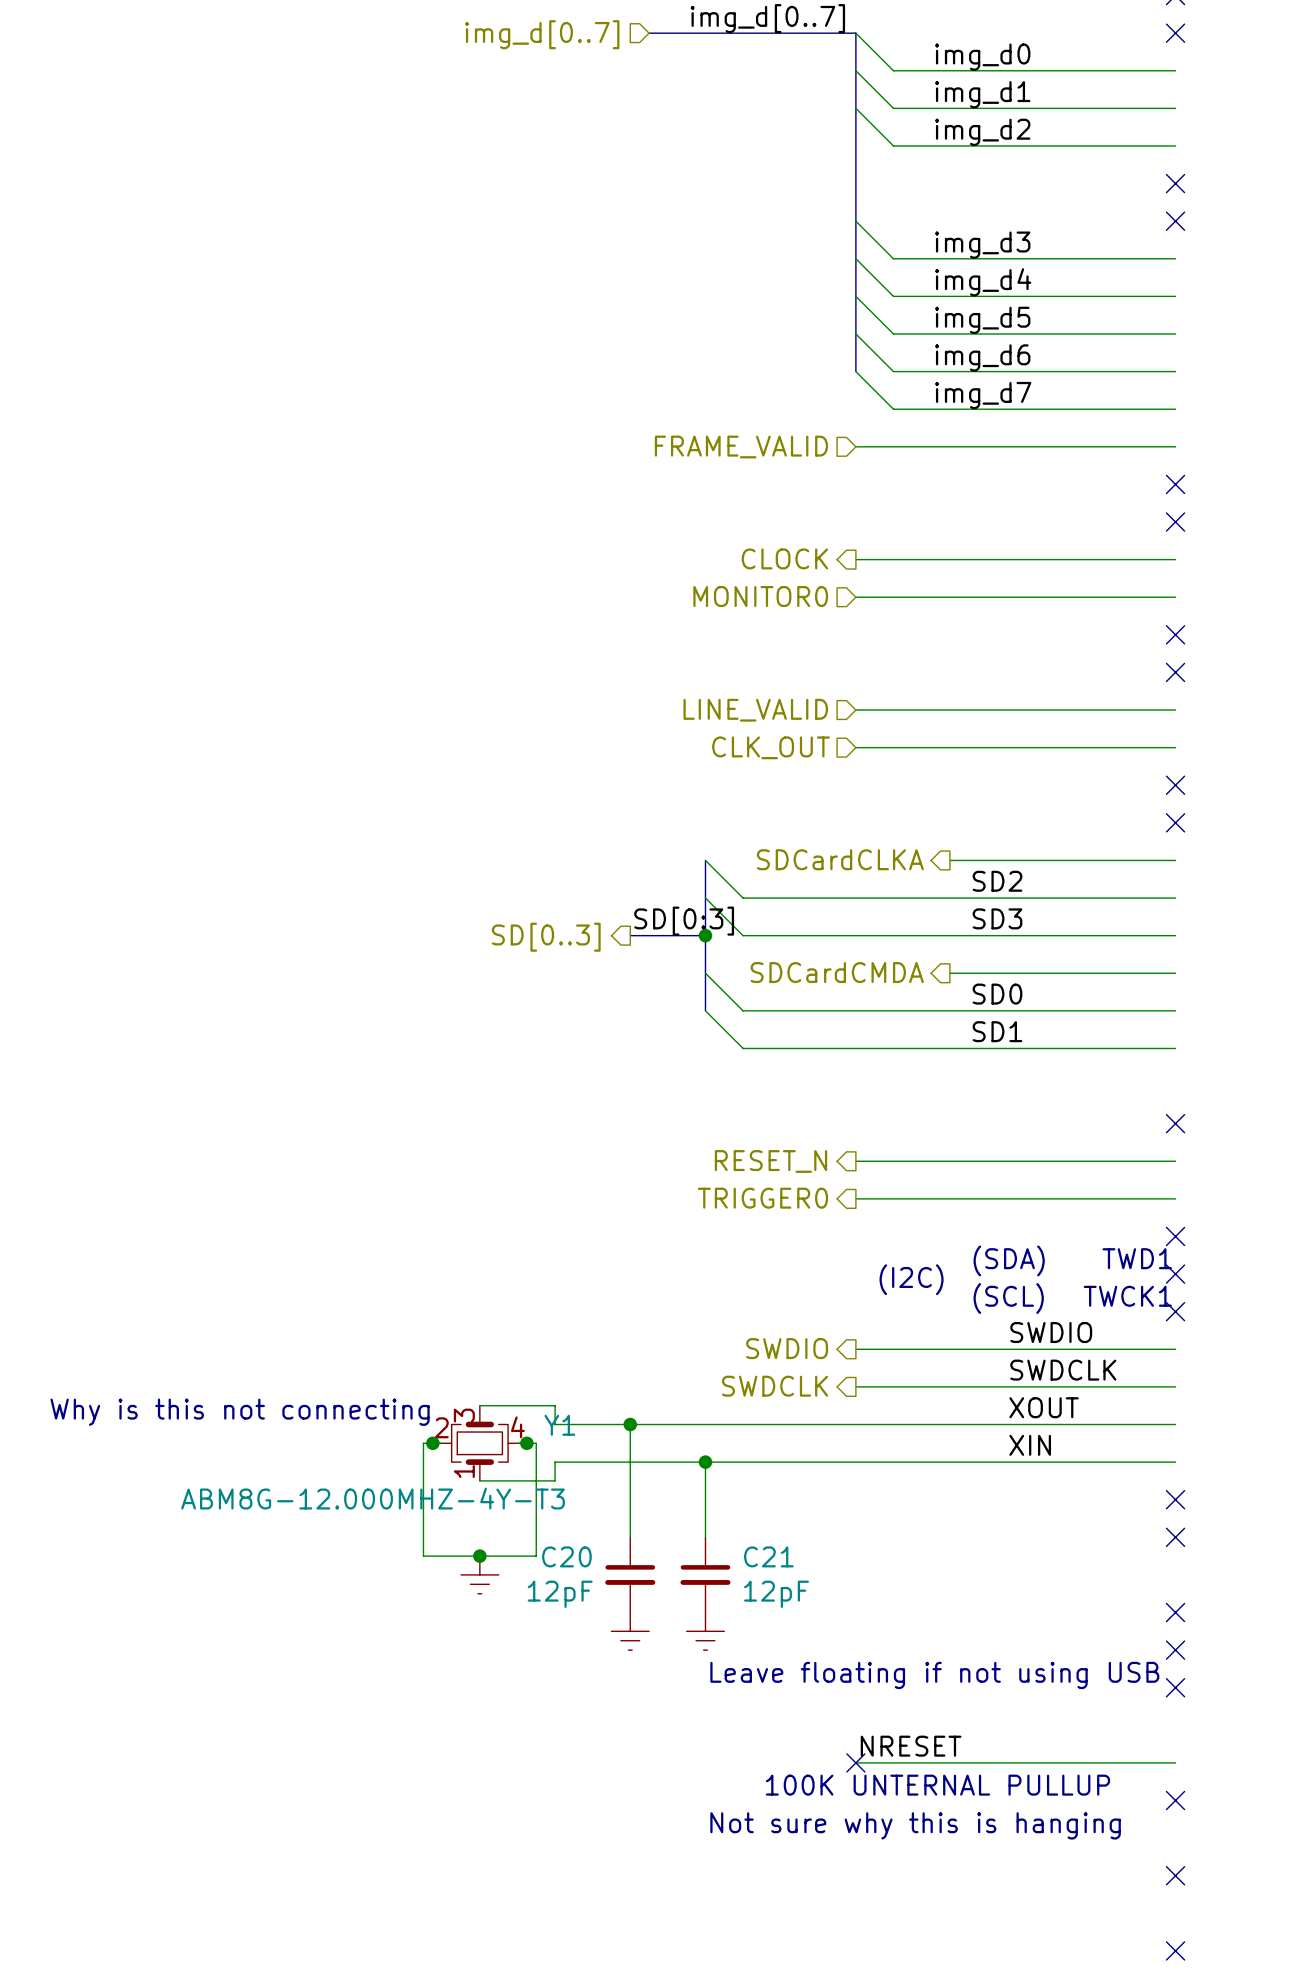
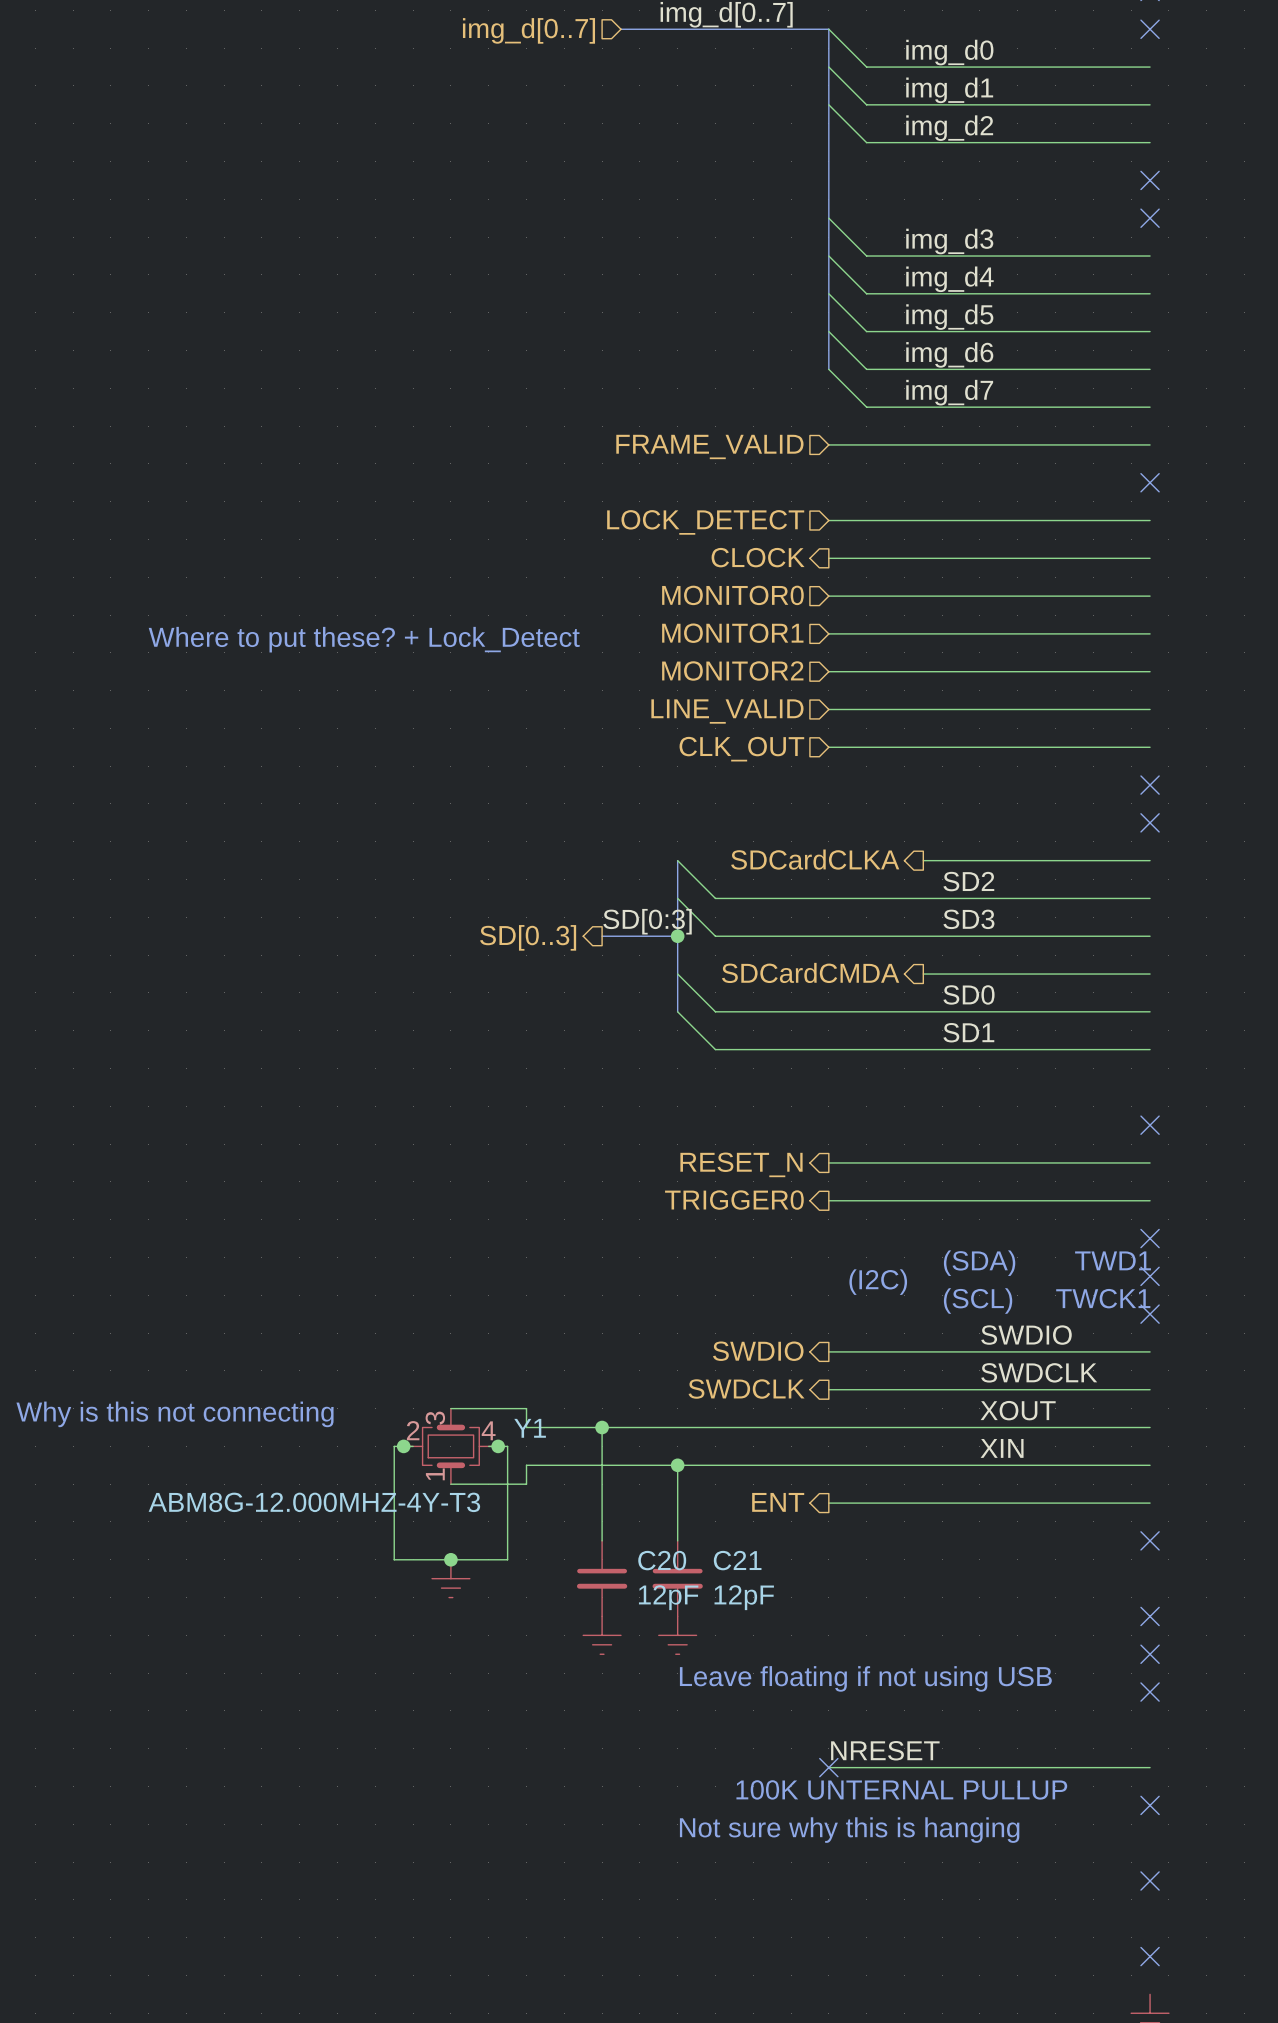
hierarchical label: none -> LOCK_DETECT (705, 522)
wire: none -> (828, 520) (1150, 520)
no-connect mark: (1175, 522) -> none
hierarchical label: none -> MONITOR1 (732, 633)
wire: none -> (828, 633) (1150, 633)
no-connect mark: (1175, 634) -> none
text: none -> Where to put these? + Lock_Detect (364, 639)
hierarchical label: none -> MONITOR2 (732, 670)
wire: none -> (828, 671) (1150, 671)
no-connect mark: (1175, 672) -> none
hierarchical label: none -> ENT (778, 1502)
wire: none -> (828, 1503) (1150, 1503)
no-connect mark: (1175, 1499) -> none
C20 name position: C20 (566, 1556) -> C20 (662, 1560)
C20 text position: 12pF (560, 1594) -> 12pF (668, 1597)

